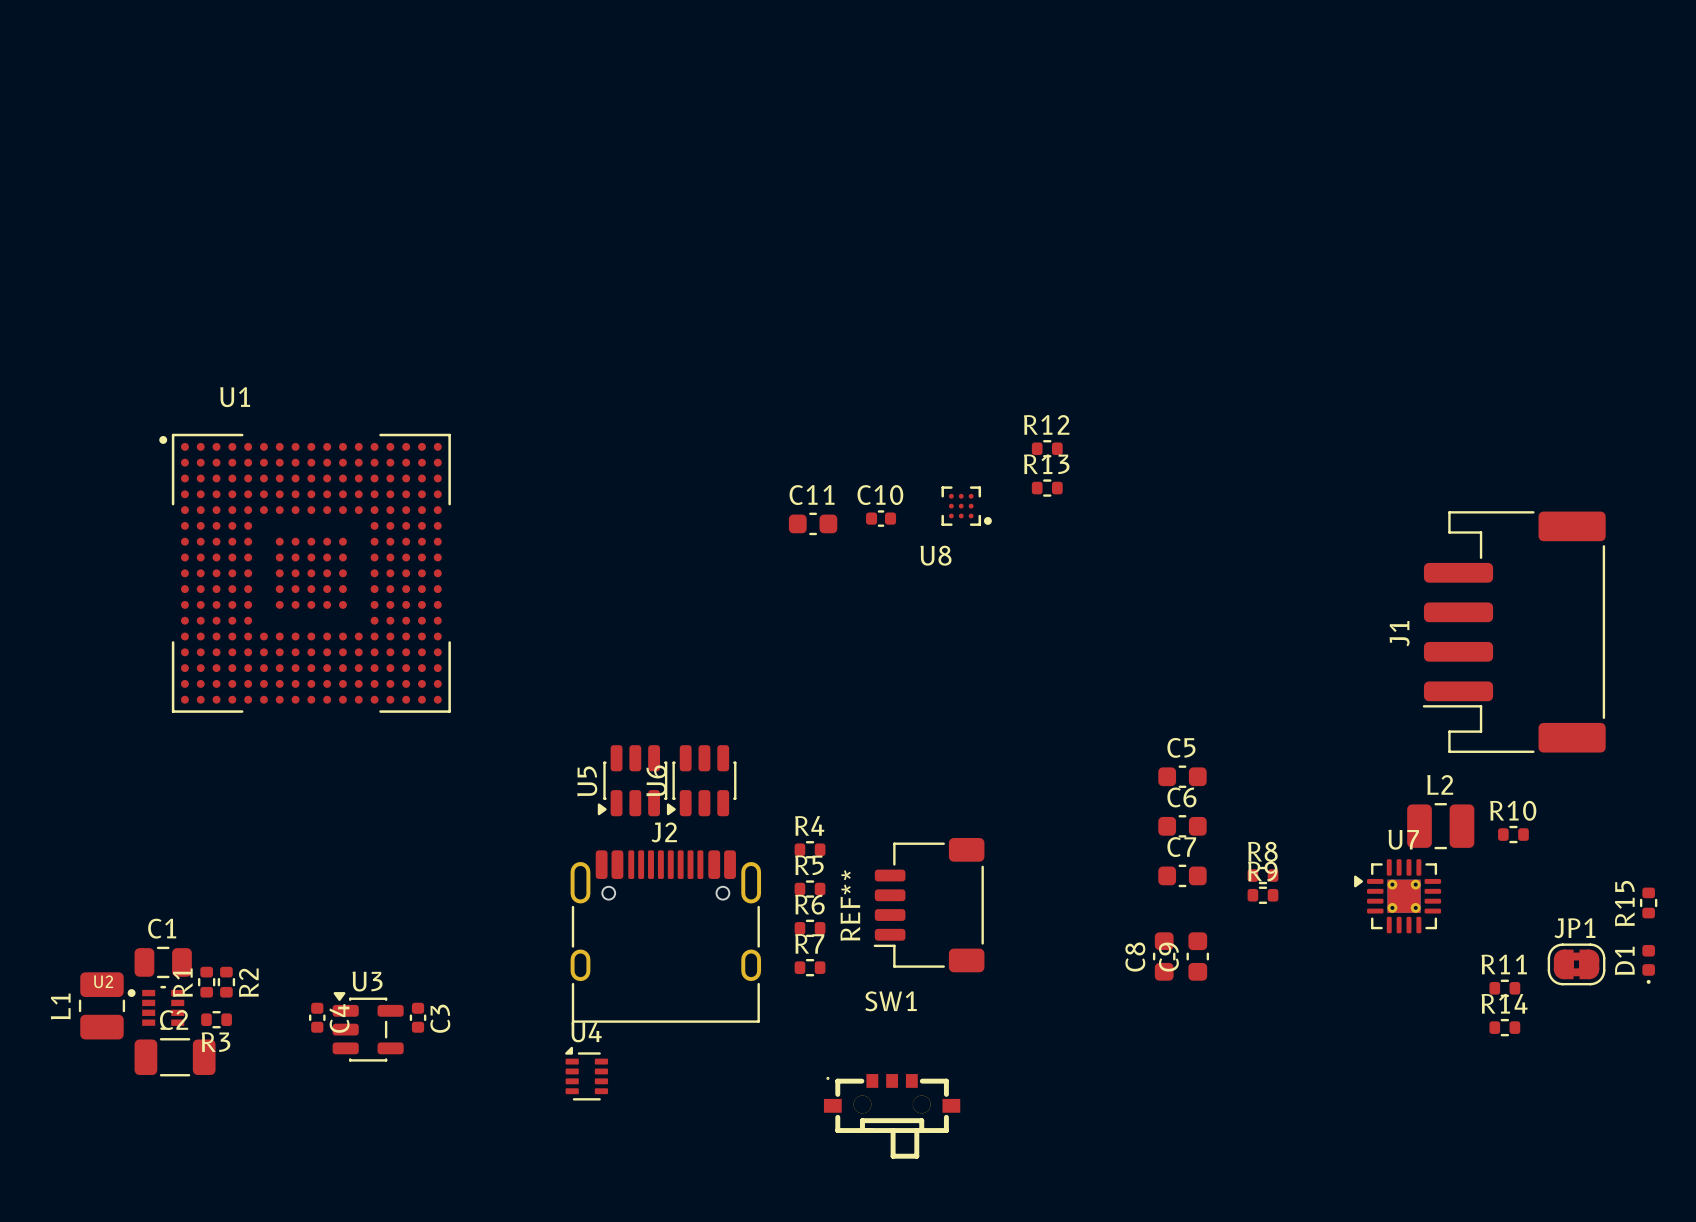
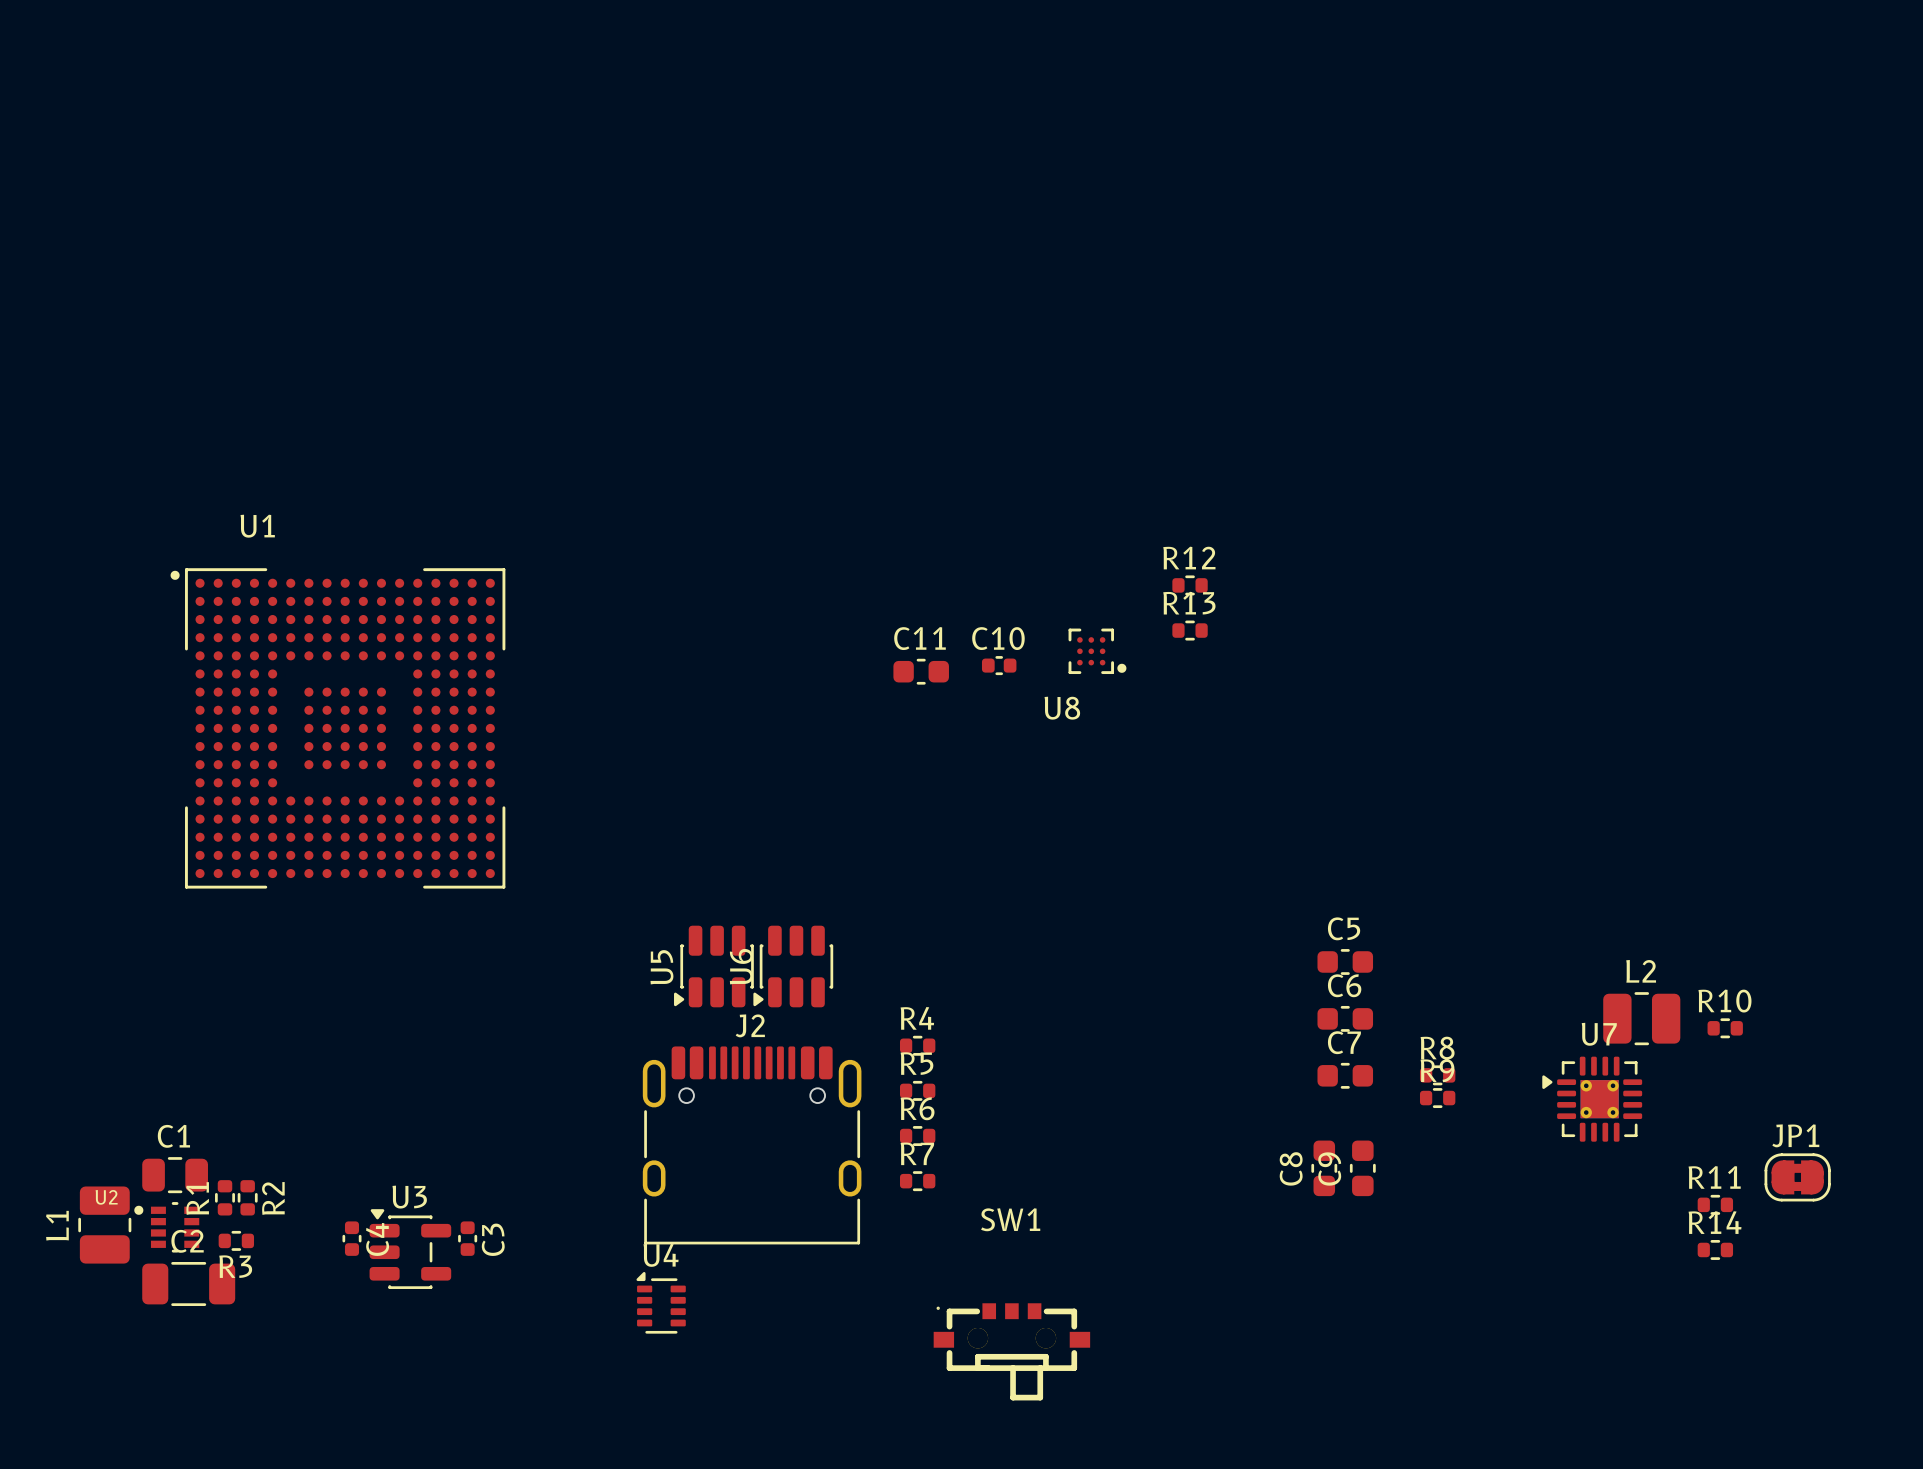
J1: (1514, 632) -> none
R15: (1648, 902) -> none
REF**: (929, 905) -> none
D1: (1648, 964) -> none

